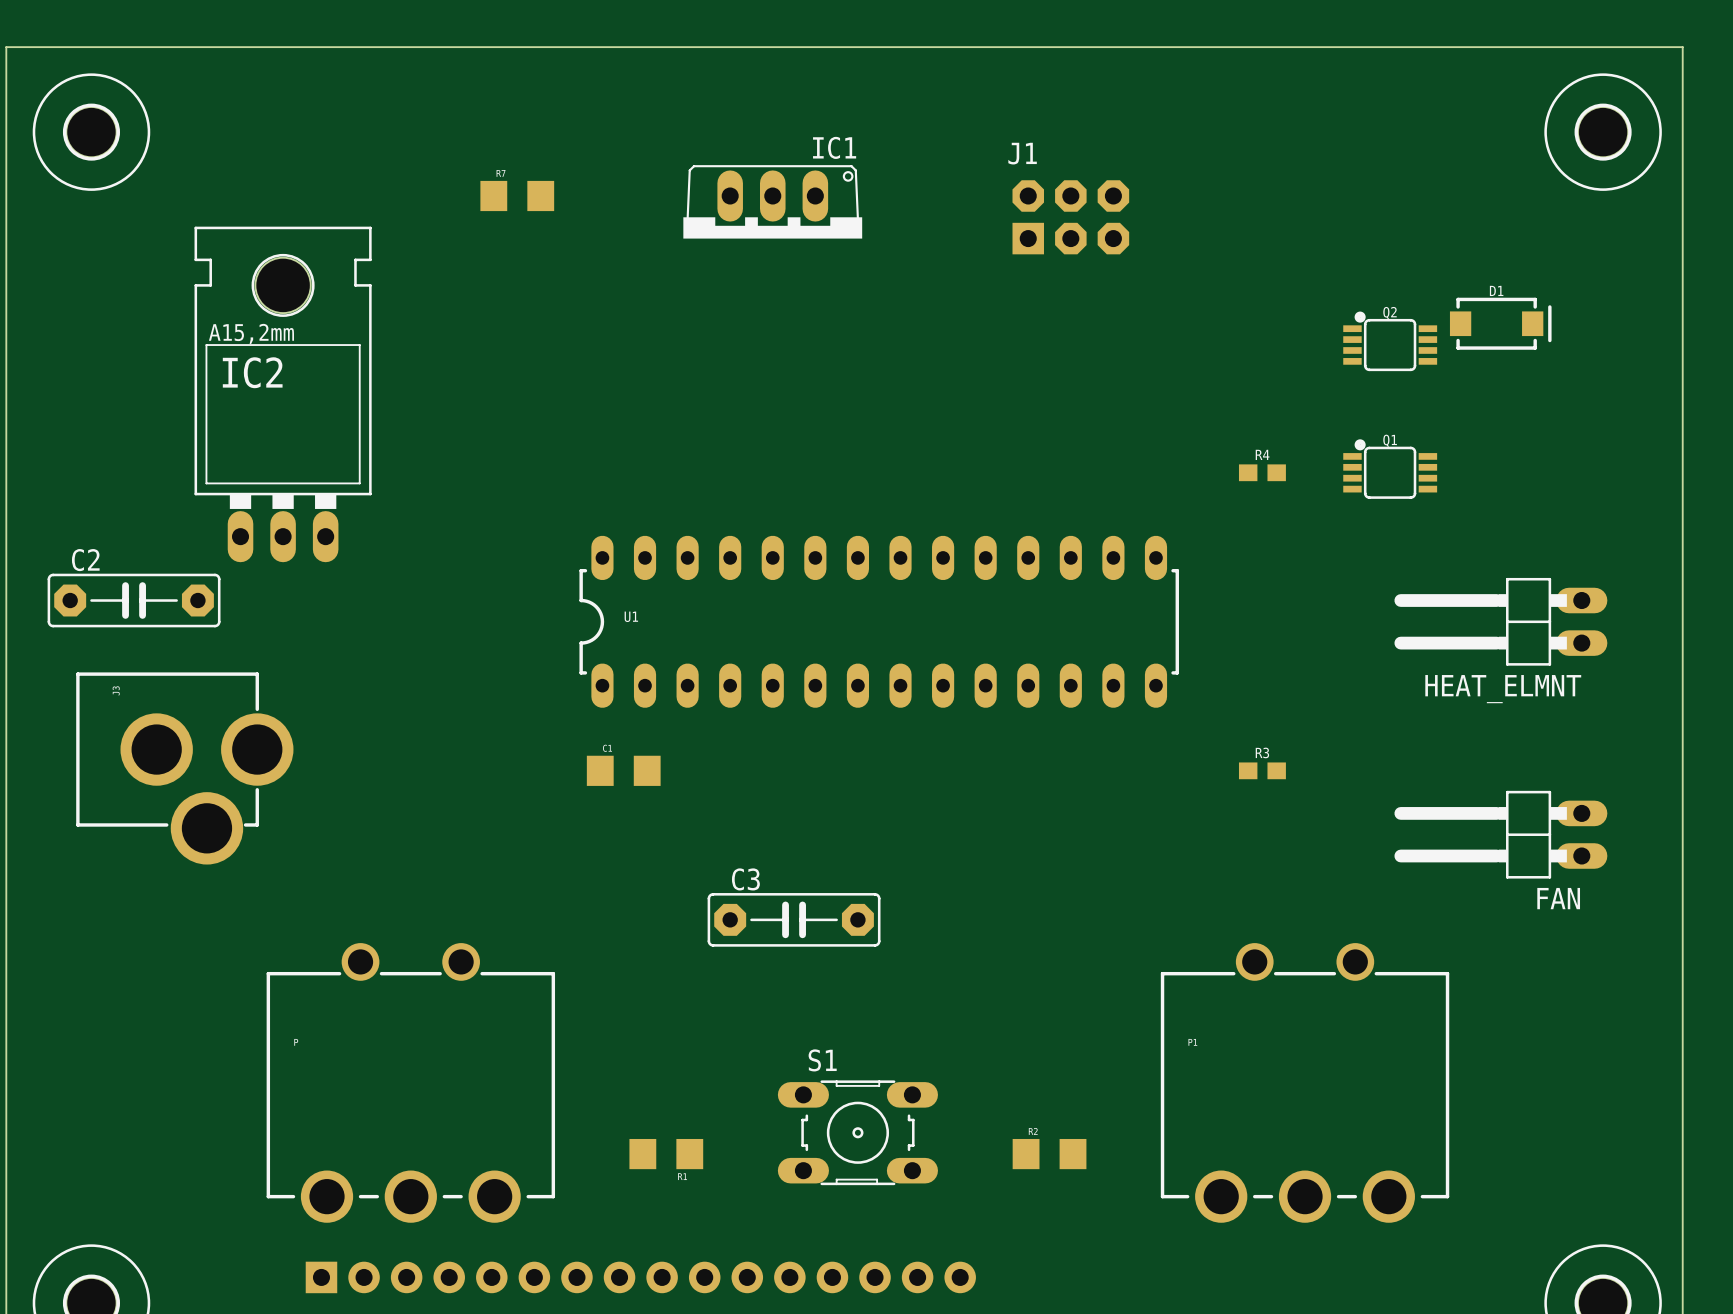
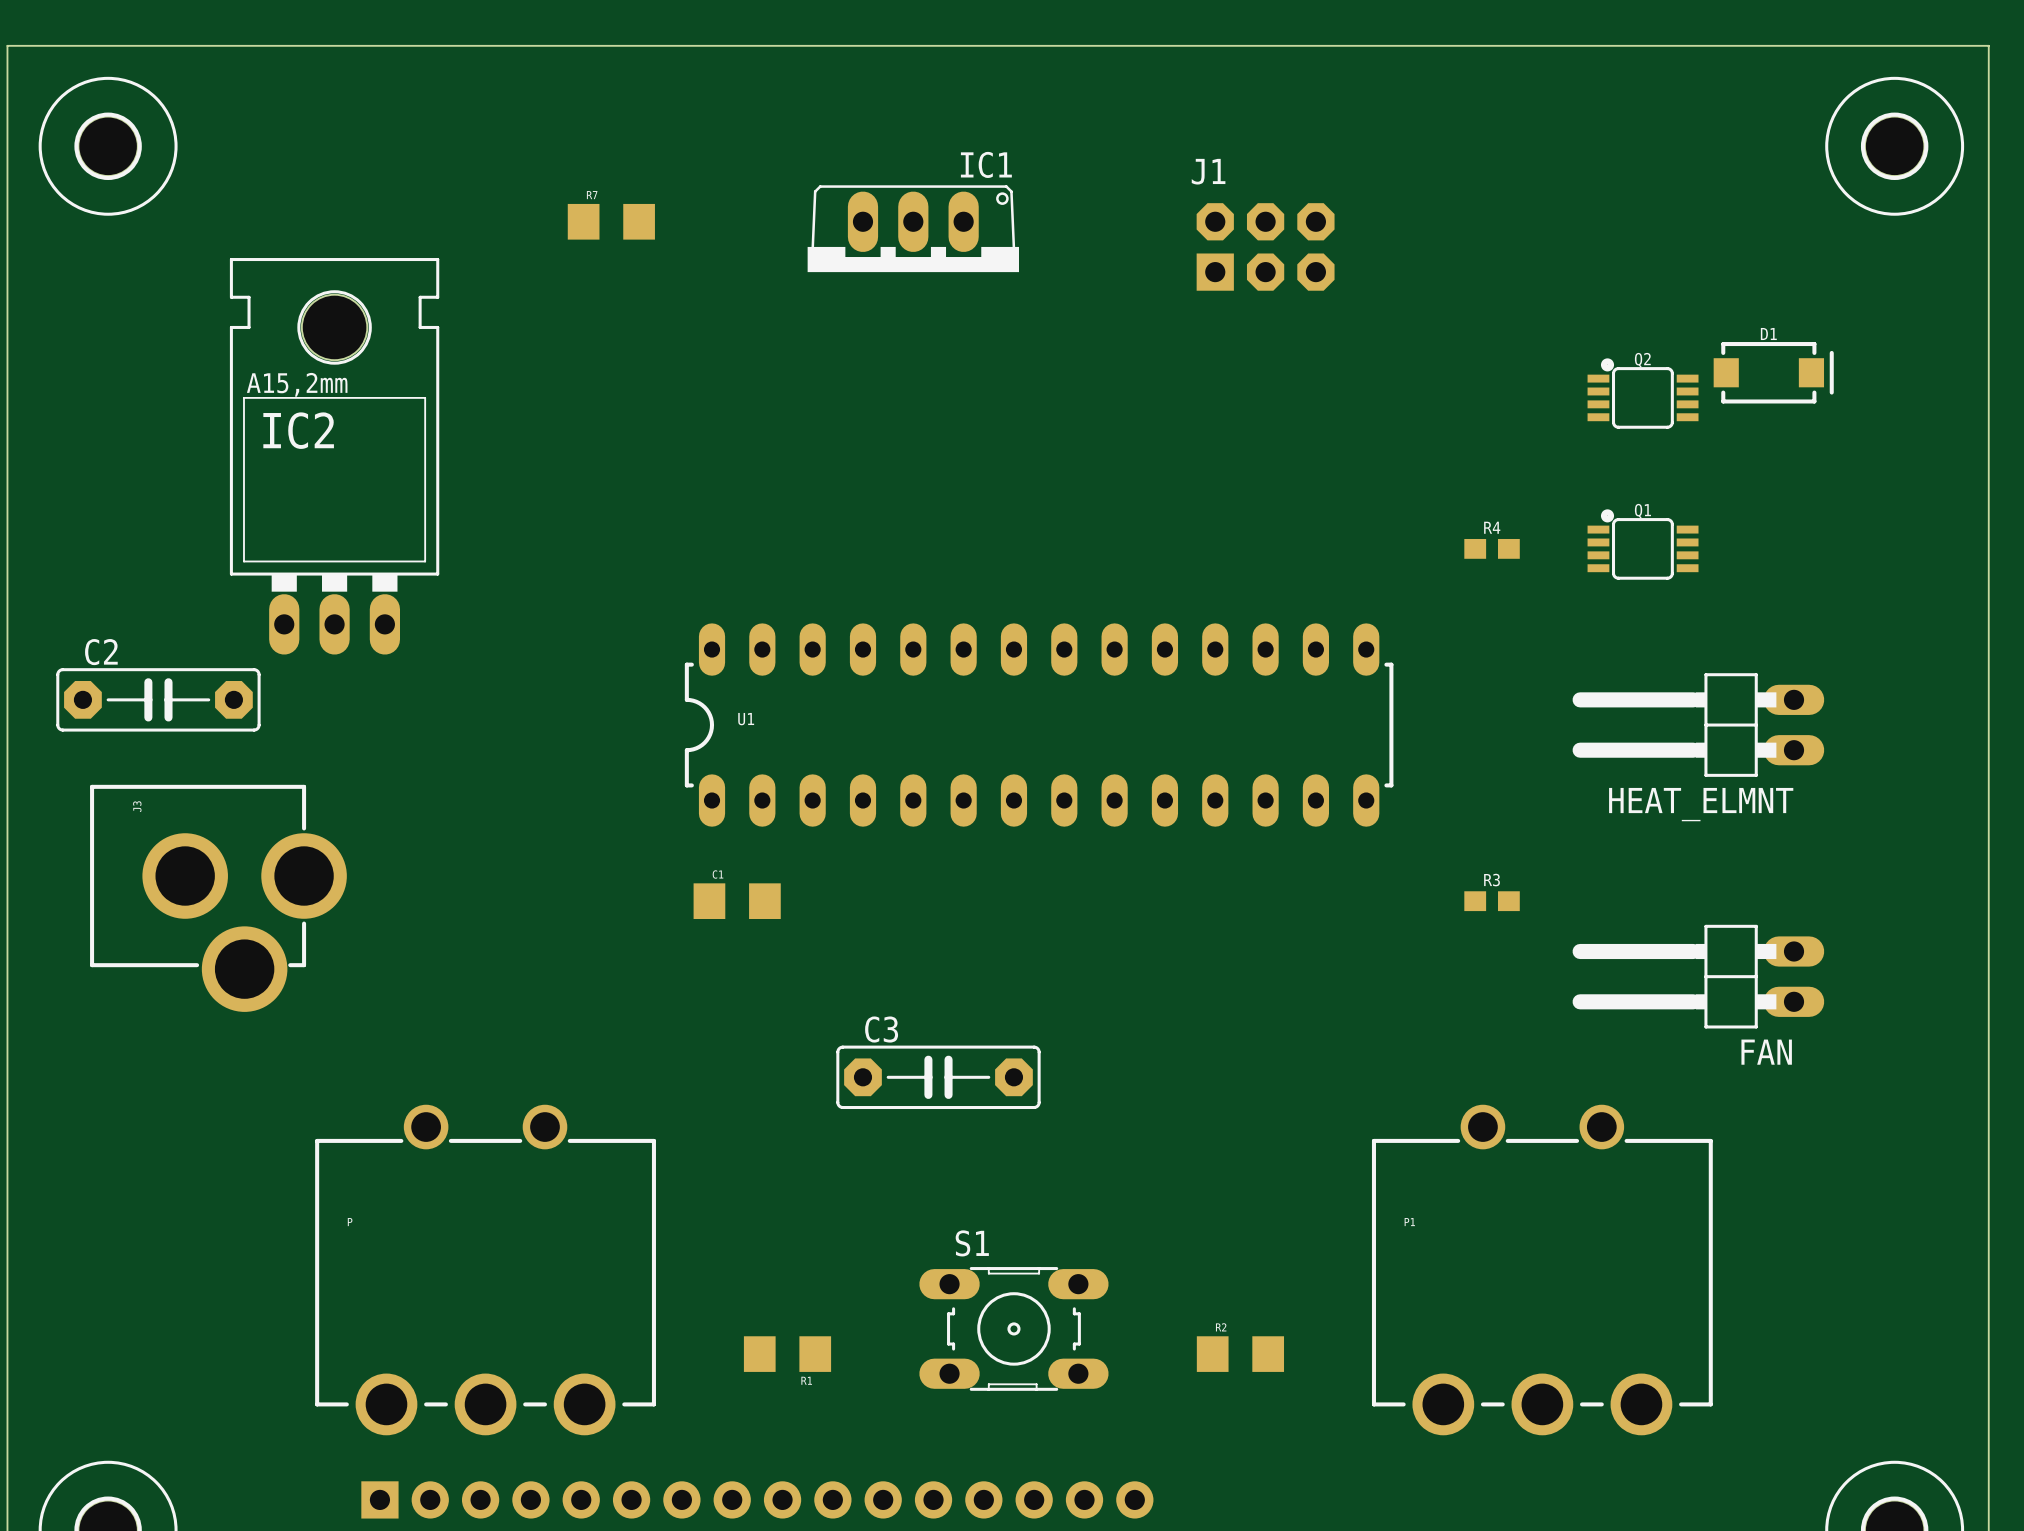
HEAT_ELMNT position: (1500, 621) -> (1698, 725)
FAN position: (1500, 834) -> (1698, 976)

